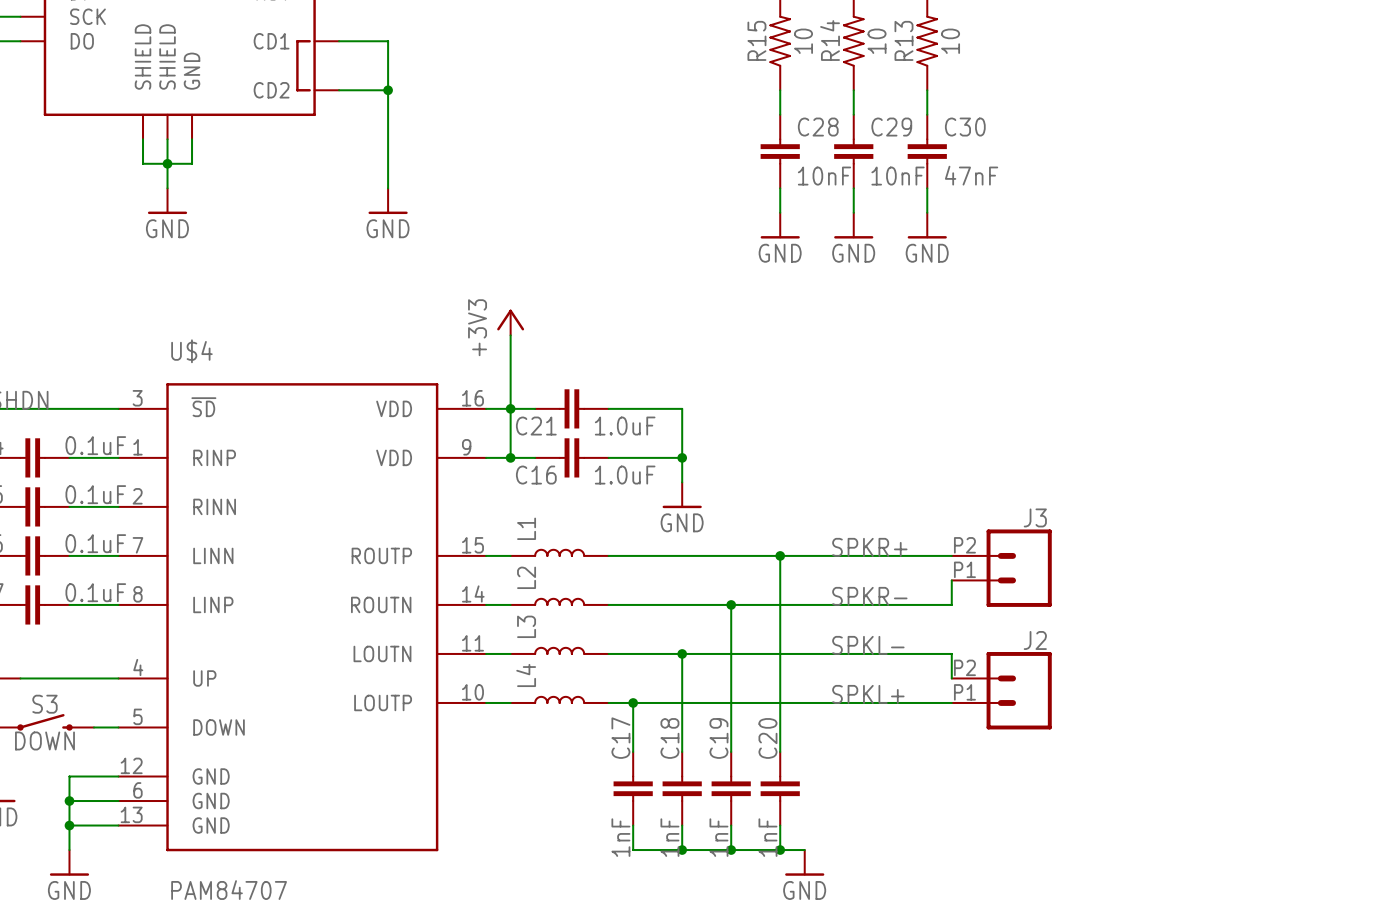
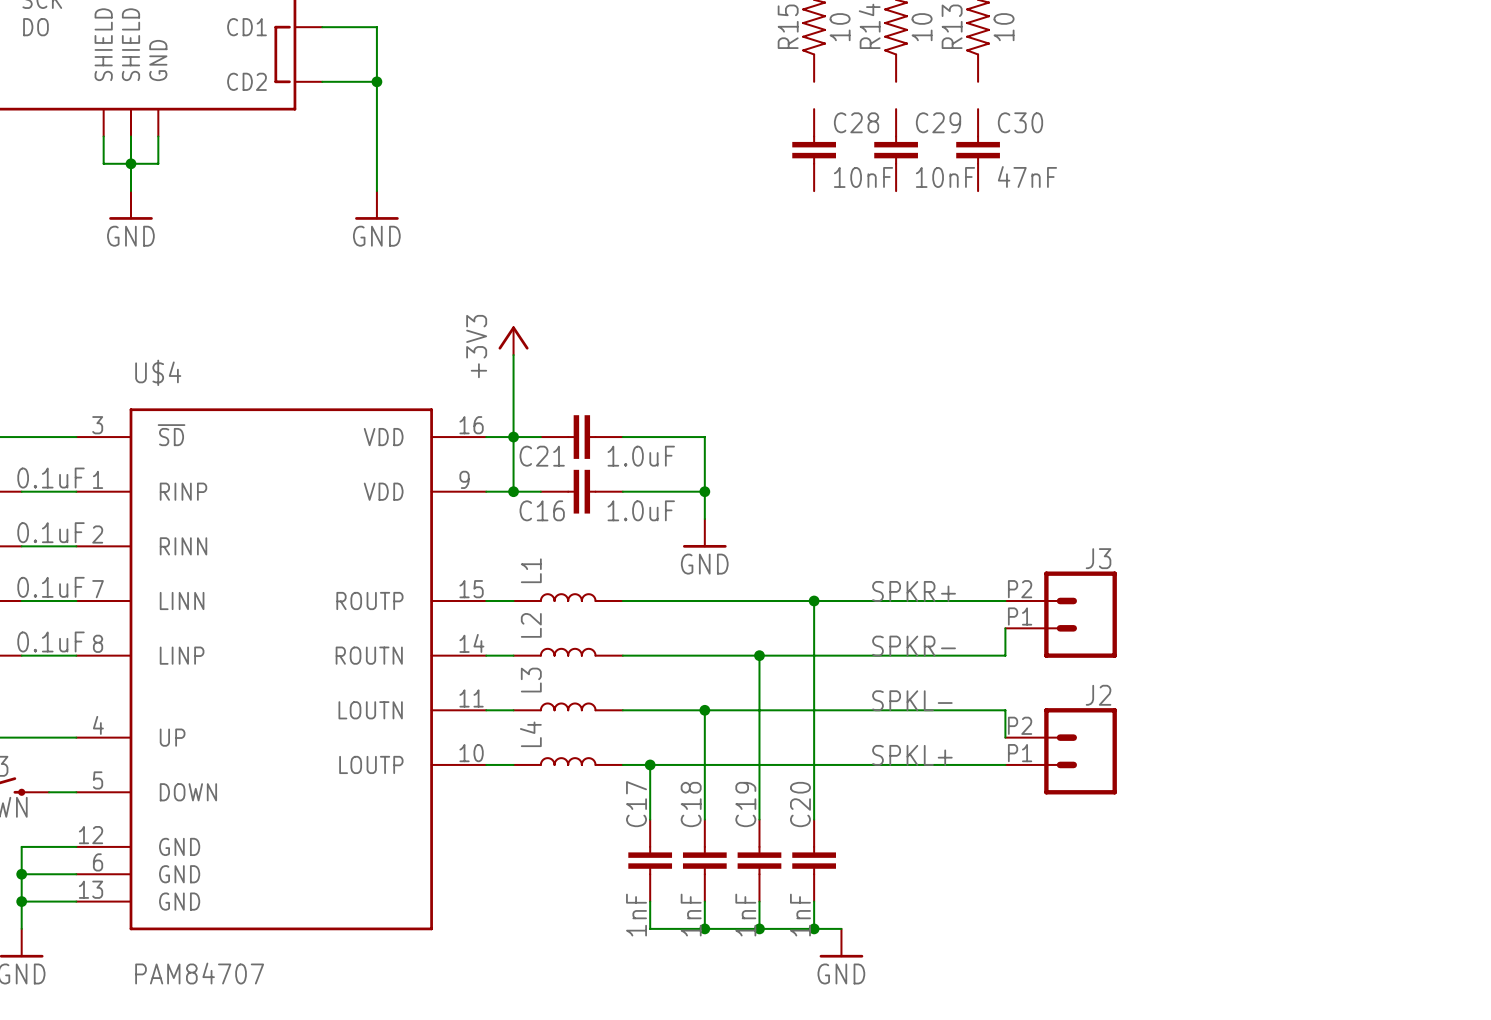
wire: (780, 90) (780, 114) -> none
wire: (853, 90) (853, 114) -> none
wire: (927, 90) (927, 114) -> none
wire: (780, 188) (780, 212) -> none
wire: (853, 188) (853, 212) -> none
wire: (927, 188) (927, 212) -> none
power symbol: GND (780, 225) -> none
power symbol: GND (853, 225) -> none
power symbol: GND (927, 225) -> none

